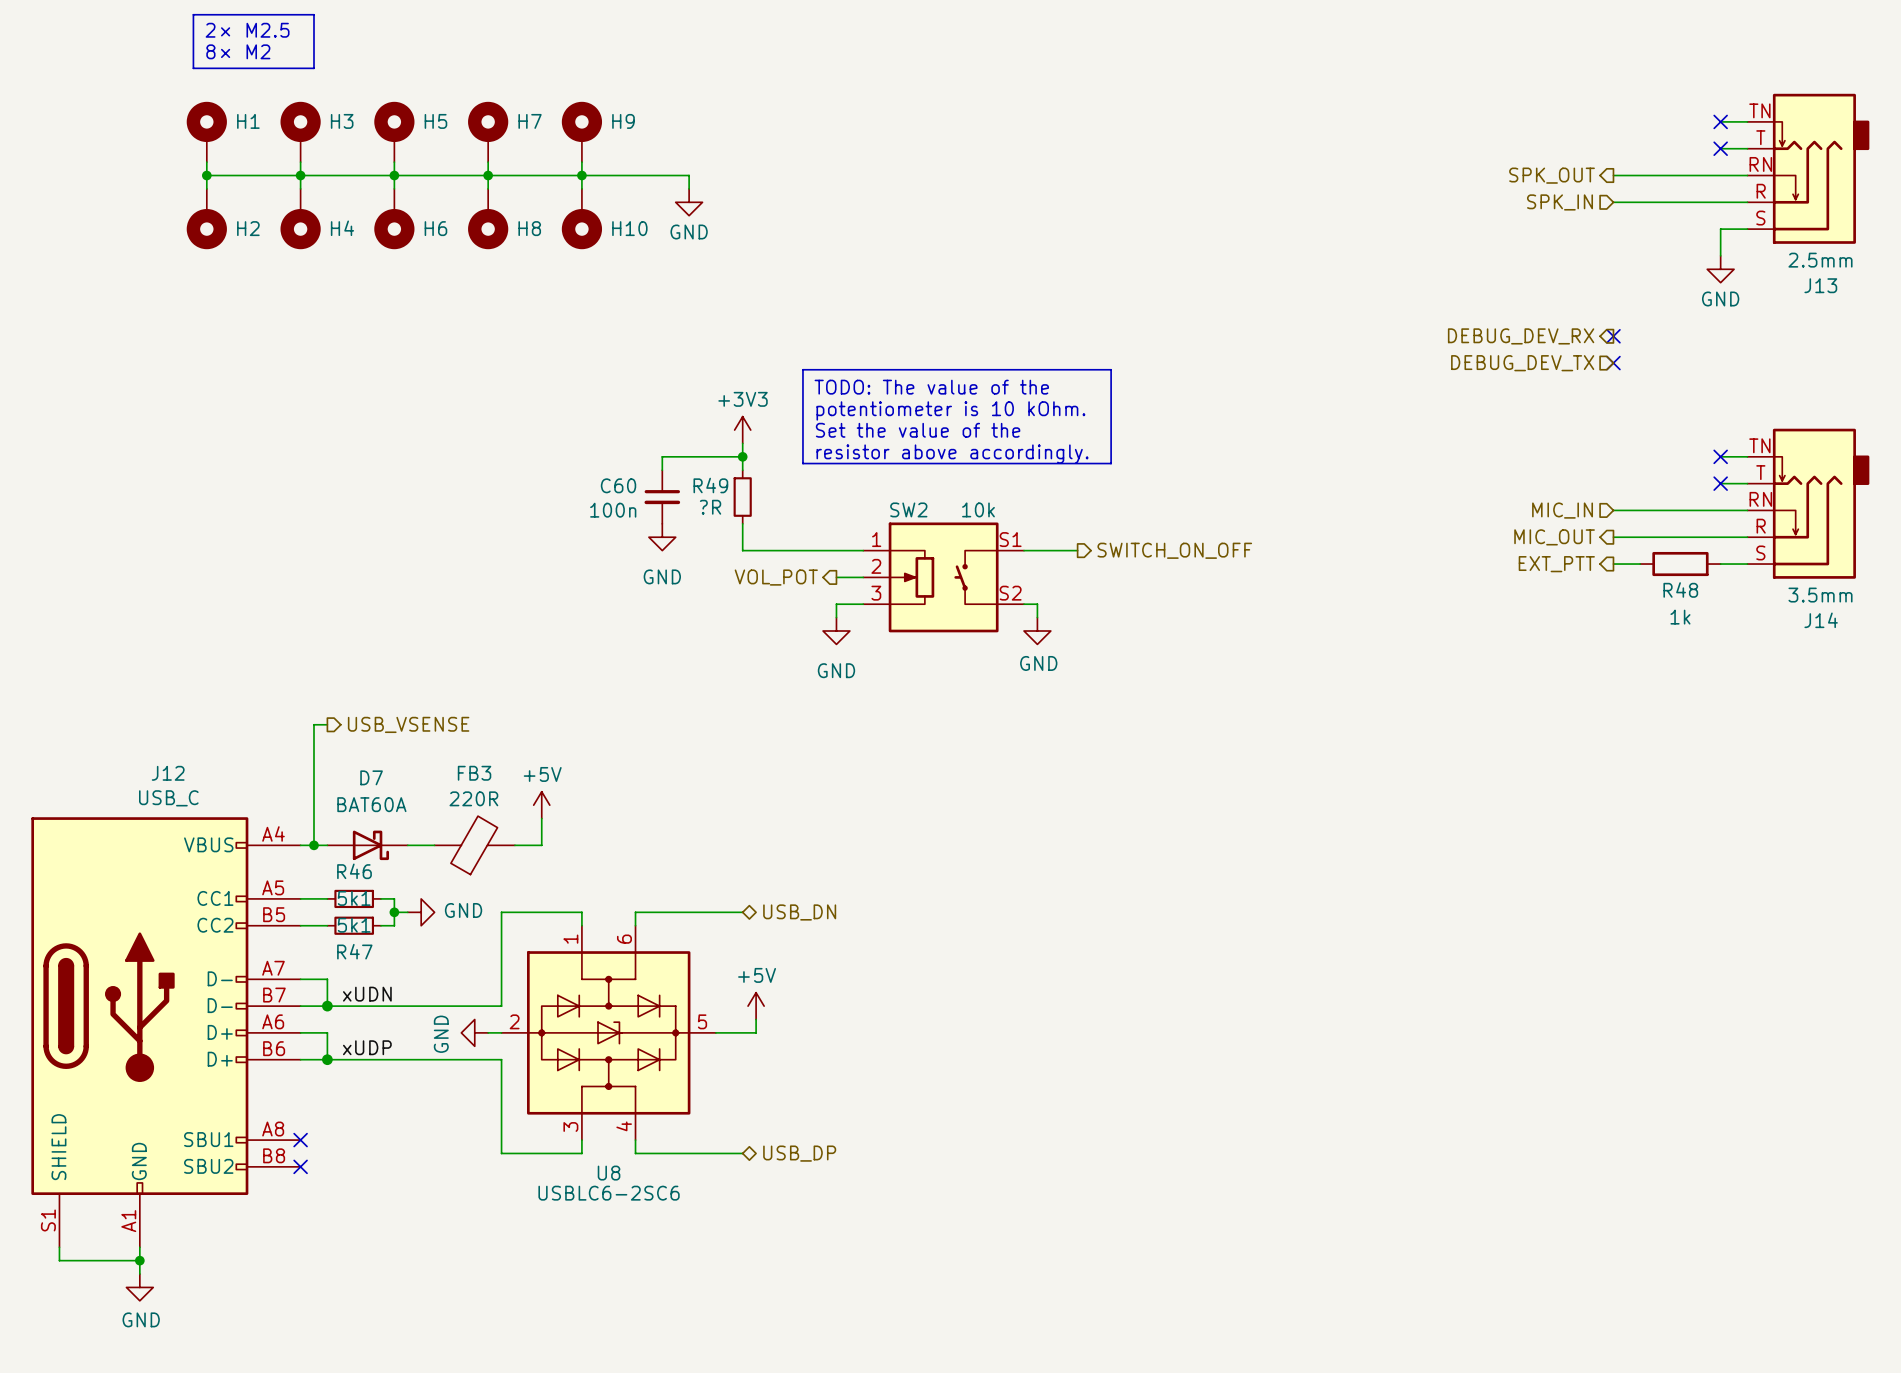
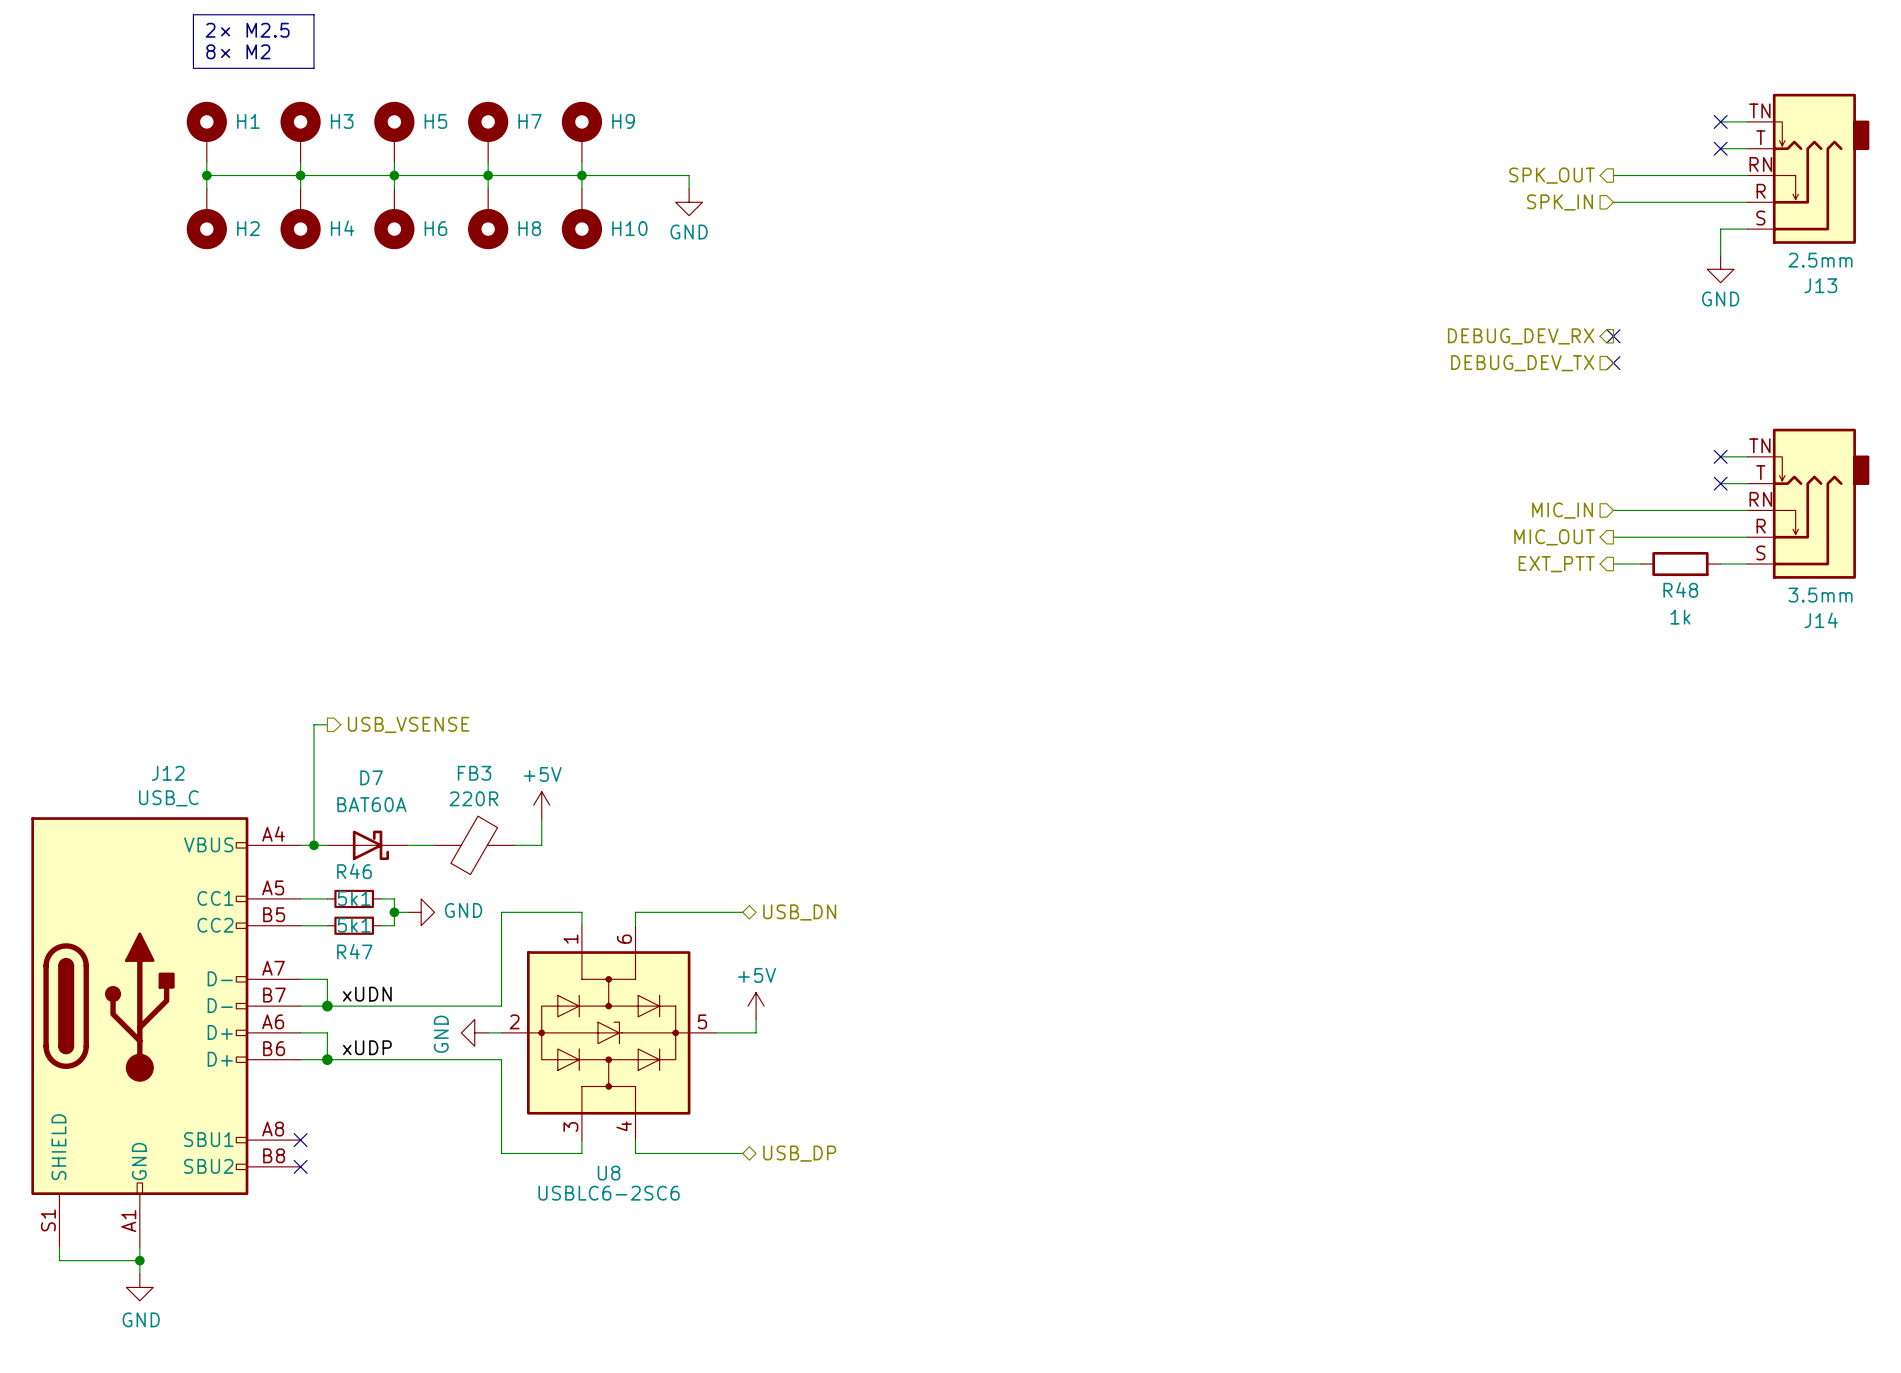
line: (802, 369) (1111, 369) (1111, 463) (802, 463) (802, 369) -> none
text: TODO: The value of the (931, 387) -> none
text: potentiometer is 10 kOhm. (950, 410) -> none
power symbol: +3V3 (742, 430) -> none
text: Set the value of the (918, 430) -> none
wire: (742, 443) (742, 470) -> none
text: resistor above accordingly. (952, 454) -> none
wire: (742, 456) (662, 456) (662, 470) -> none
junction: (742, 456) -> none
C60: 100n (662, 497) -> none
R49: ?R (742, 497) -> none
wire: (742, 523) (742, 550) (863, 550) -> none
power symbol: GND (662, 537) -> none
wire: (1024, 550) (1077, 550) -> none
hierarchical label: SWITCH_ON_OFF (1174, 550) -> none
hierarchical label: VOL_POT (776, 577) -> none
wire: (836, 577) (863, 577) -> none
SW2: 10k (943, 577) -> none
wire: (863, 604) (836, 604) (836, 617) -> none
wire: (1024, 604) (1037, 604) (1037, 617) -> none
power symbol: GND (836, 631) -> none
power symbol: GND (1037, 631) -> none

